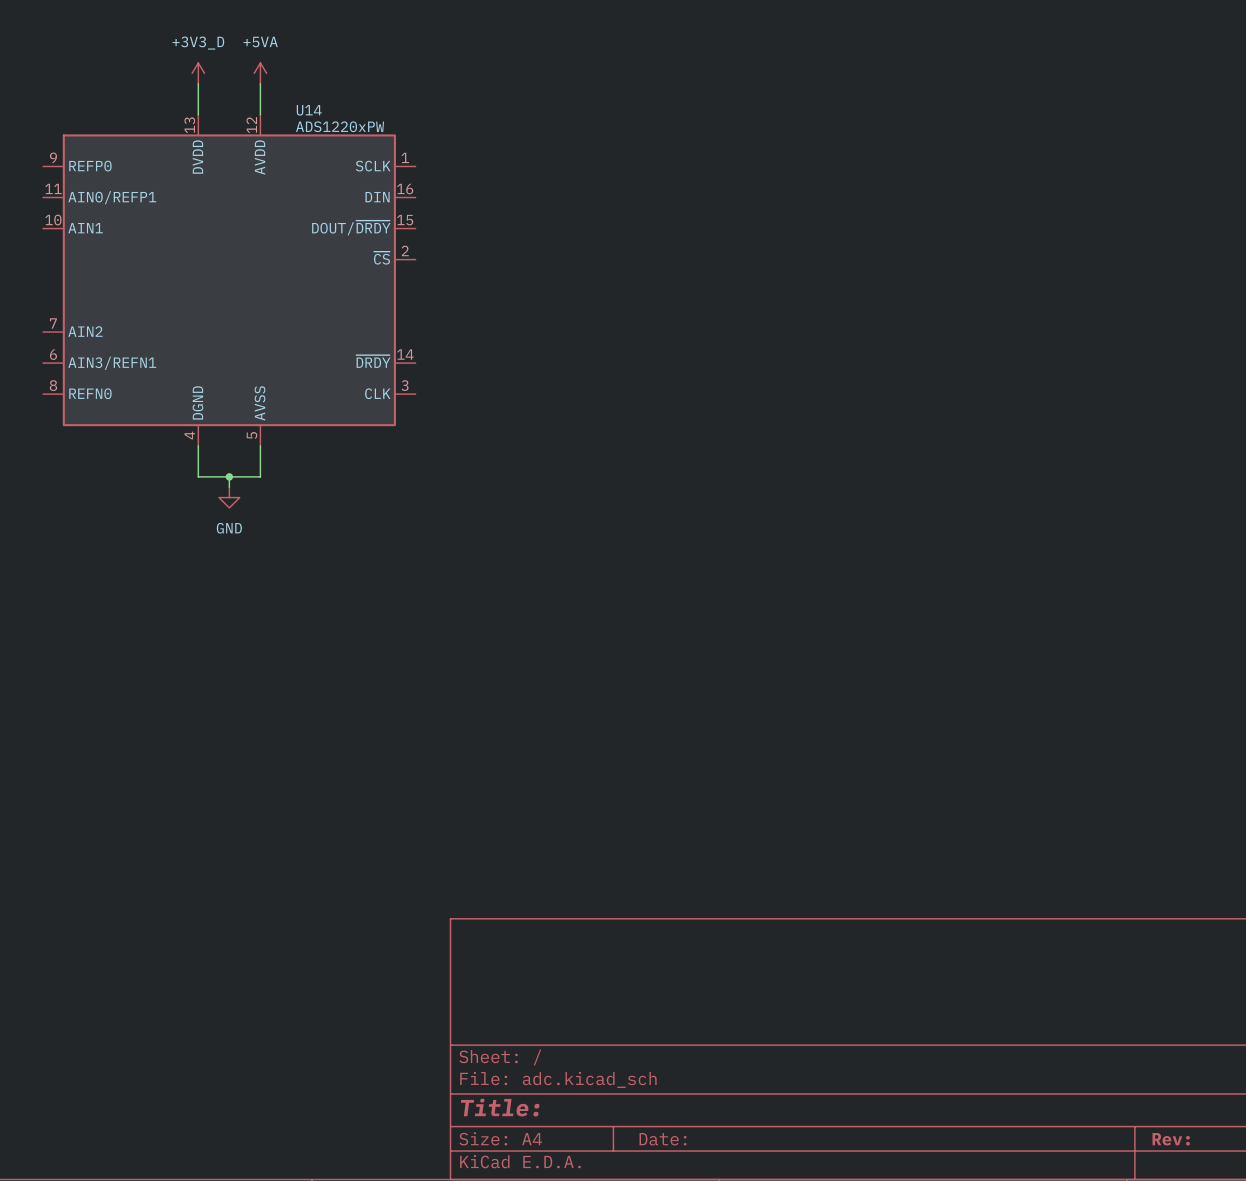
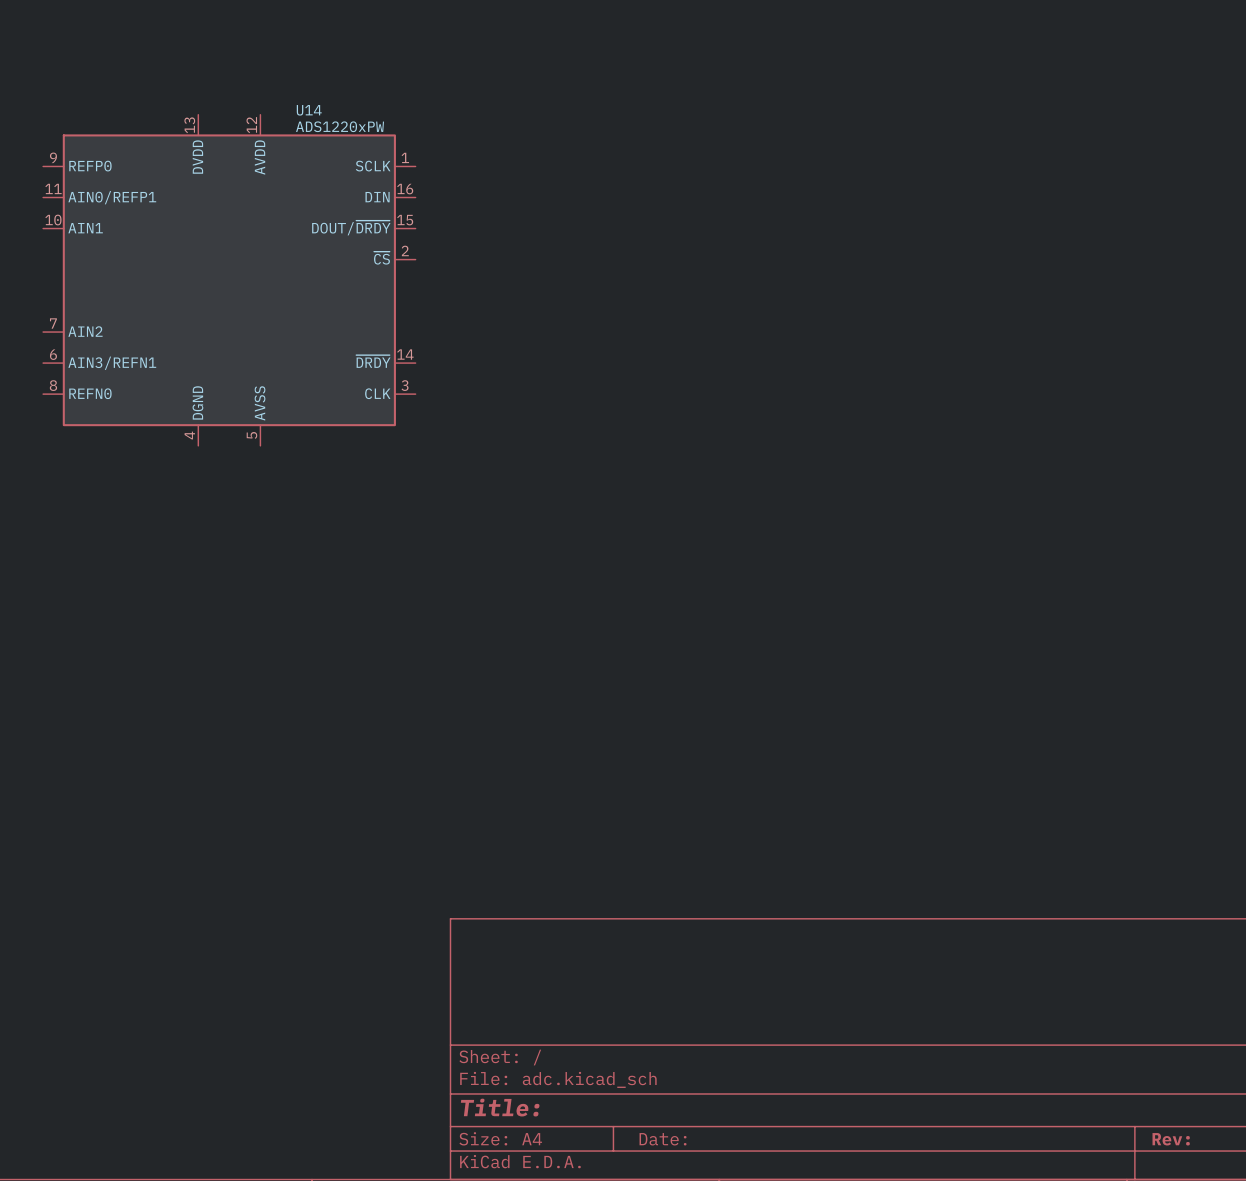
power symbol: +3V3_D (198, 73) -> none
power symbol: +5VA (260, 73) -> none
wire: (198, 83) (198, 114) -> none
wire: (260, 83) (260, 114) -> none
wire: (198, 445) (198, 476) (260, 476) (260, 445) -> none
wire: (229, 476) (229, 487) -> none
junction: (229, 476) -> none
power symbol: GND (229, 497) -> none

